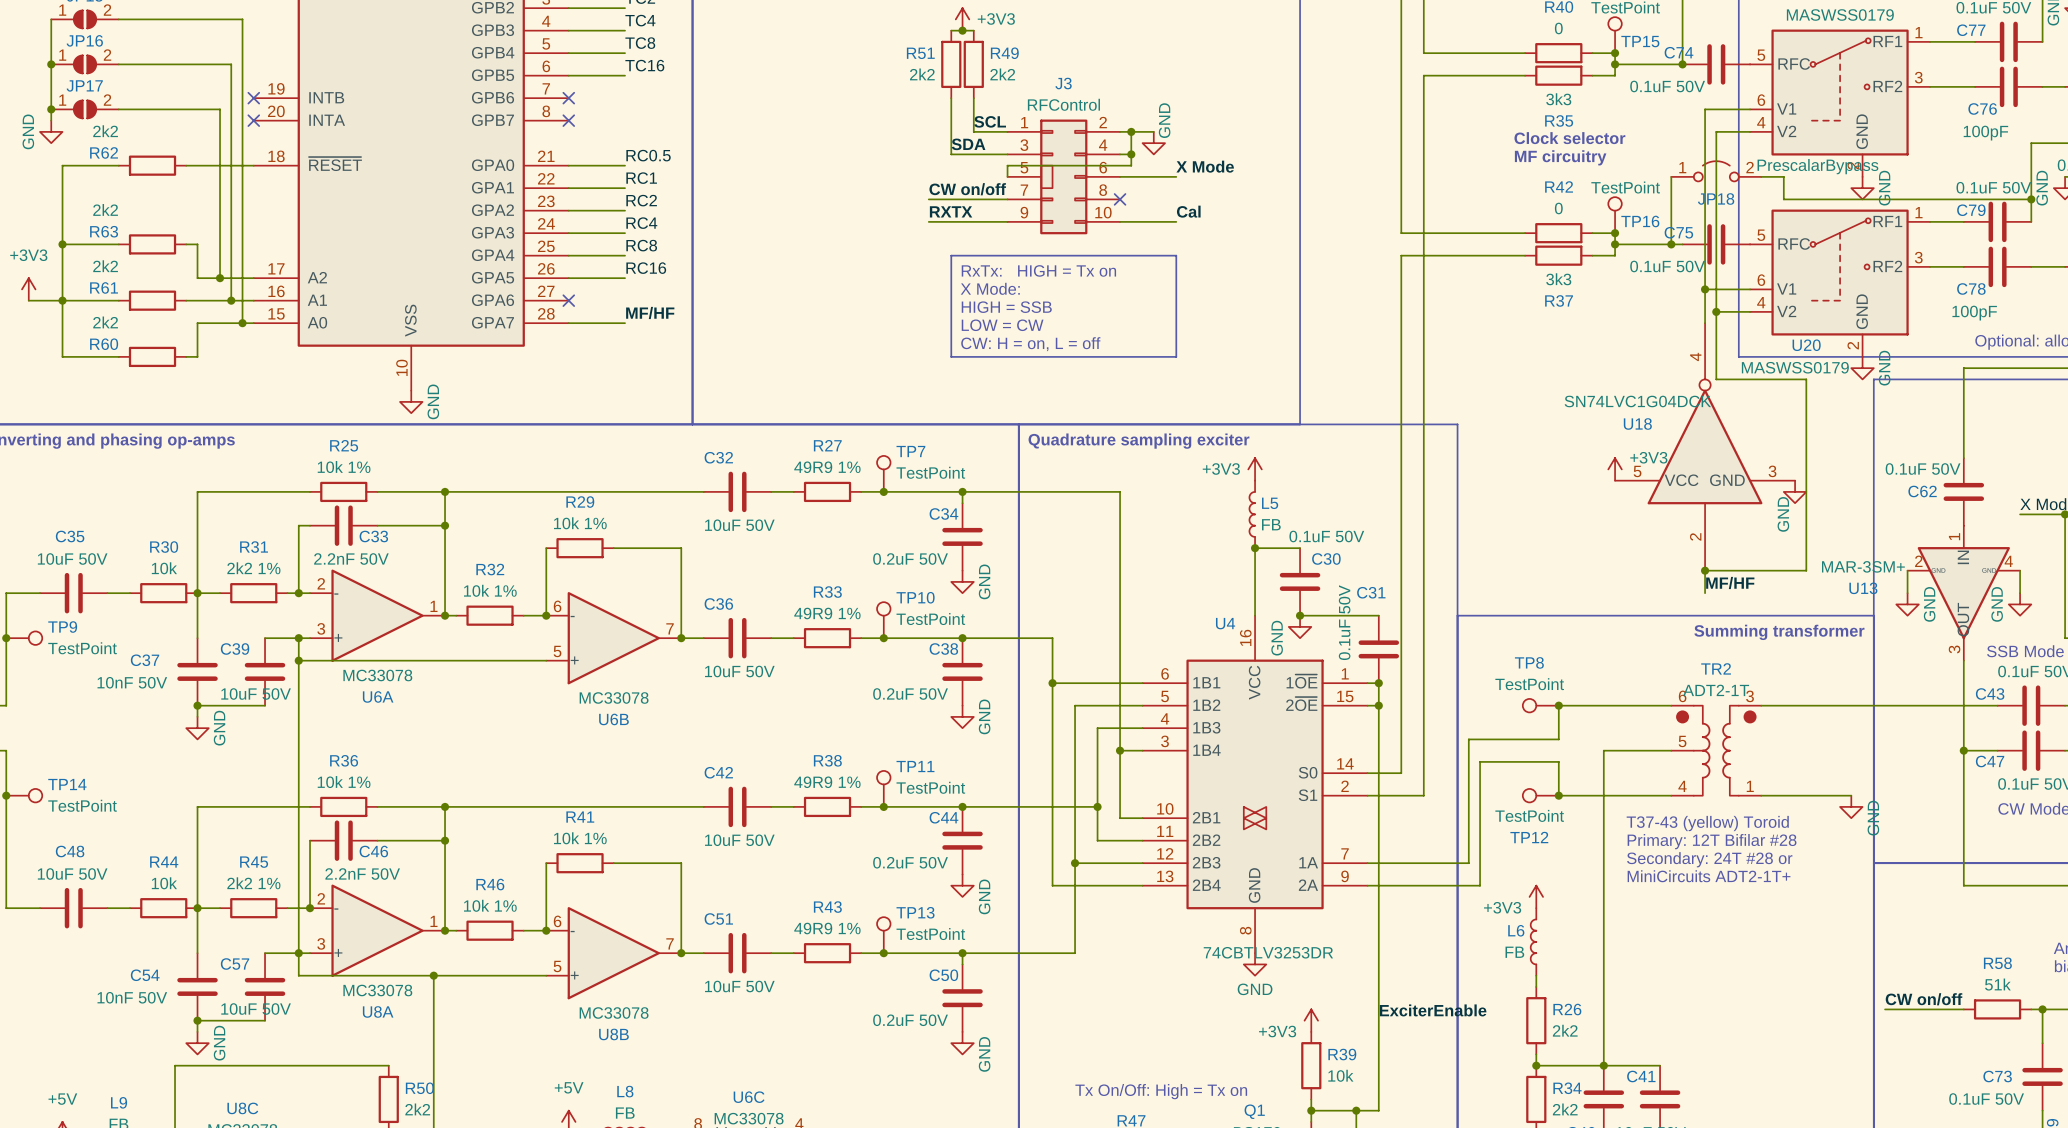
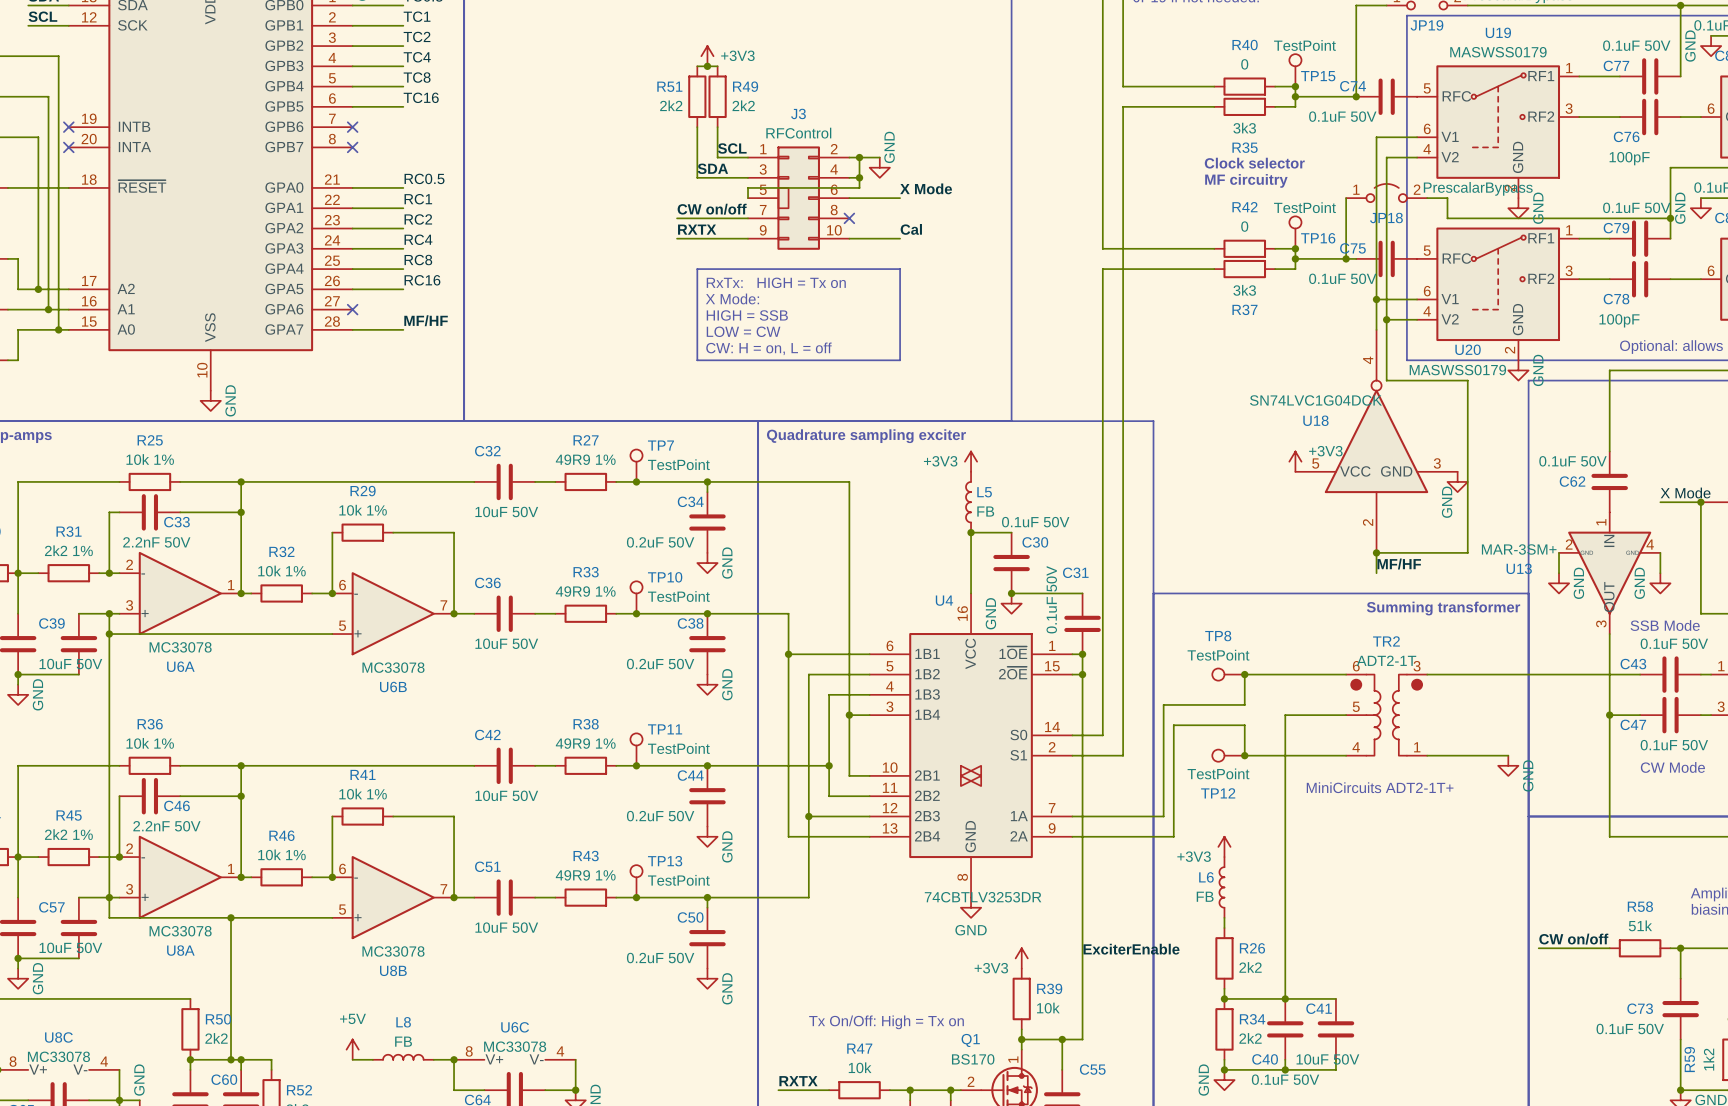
text: T37-43 (yellow) Toroid (1707, 823) -> none
text: Primary: 12T Bifilar #28 (1712, 841) -> none
text: Secondary: 24T #28 or (1709, 859) -> none
text position: MiniCircuits ADT2-1T+ (1709, 876) -> MiniCircuits ADT2-1T+ (1380, 787)

